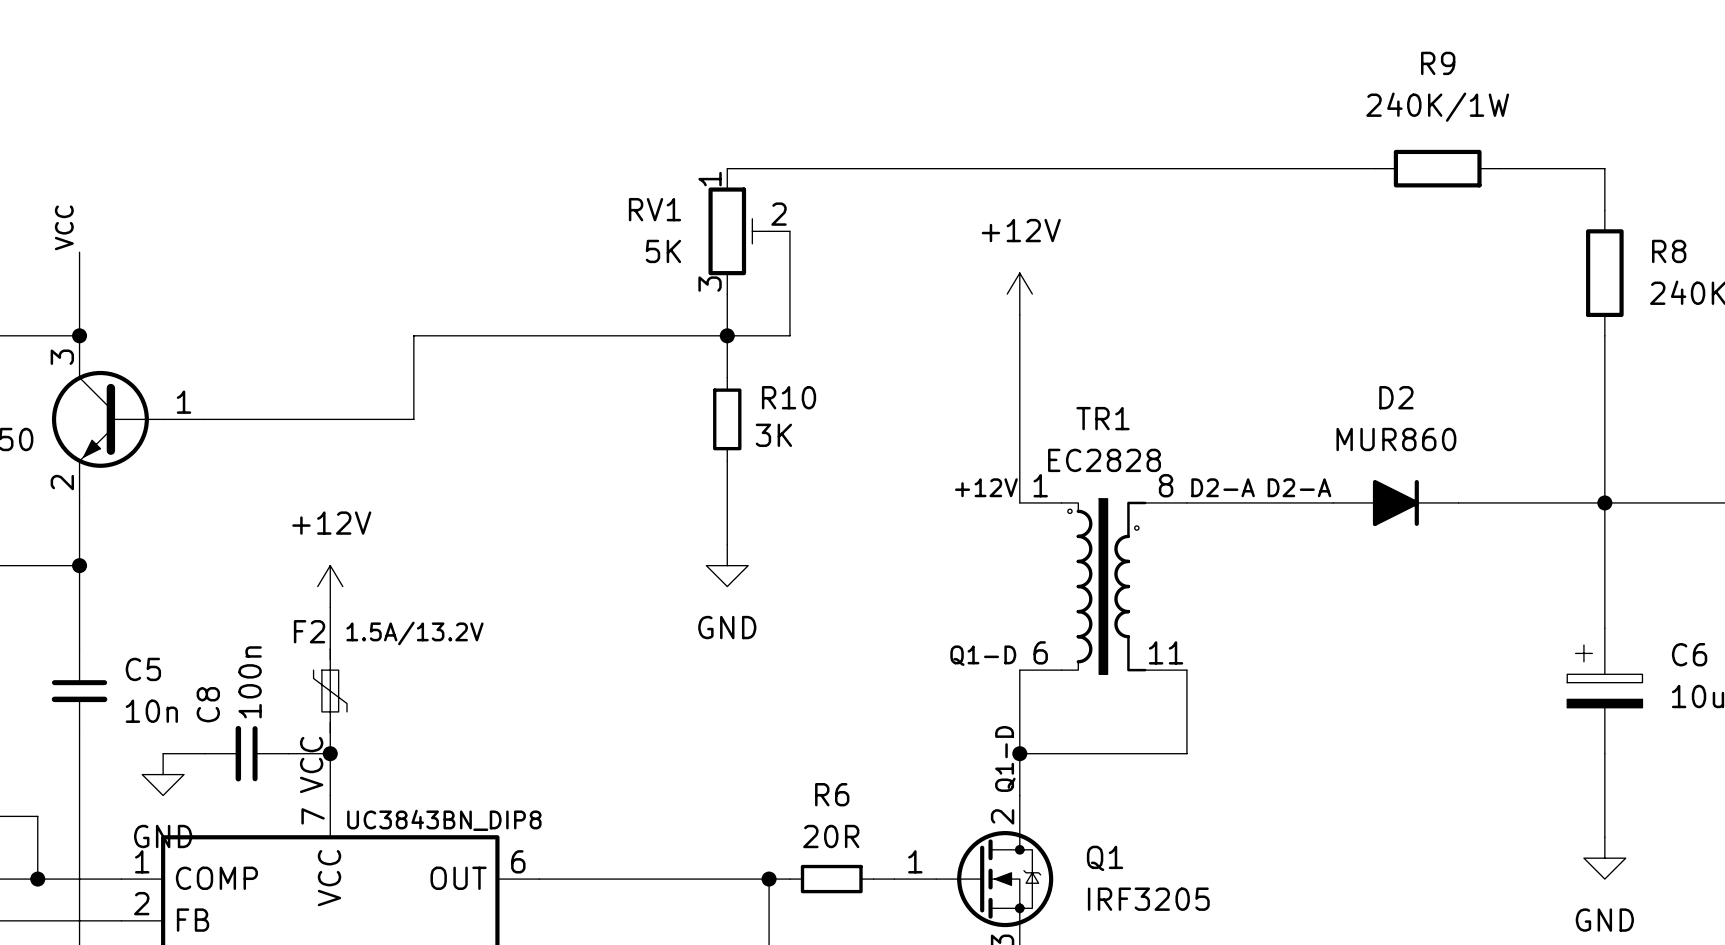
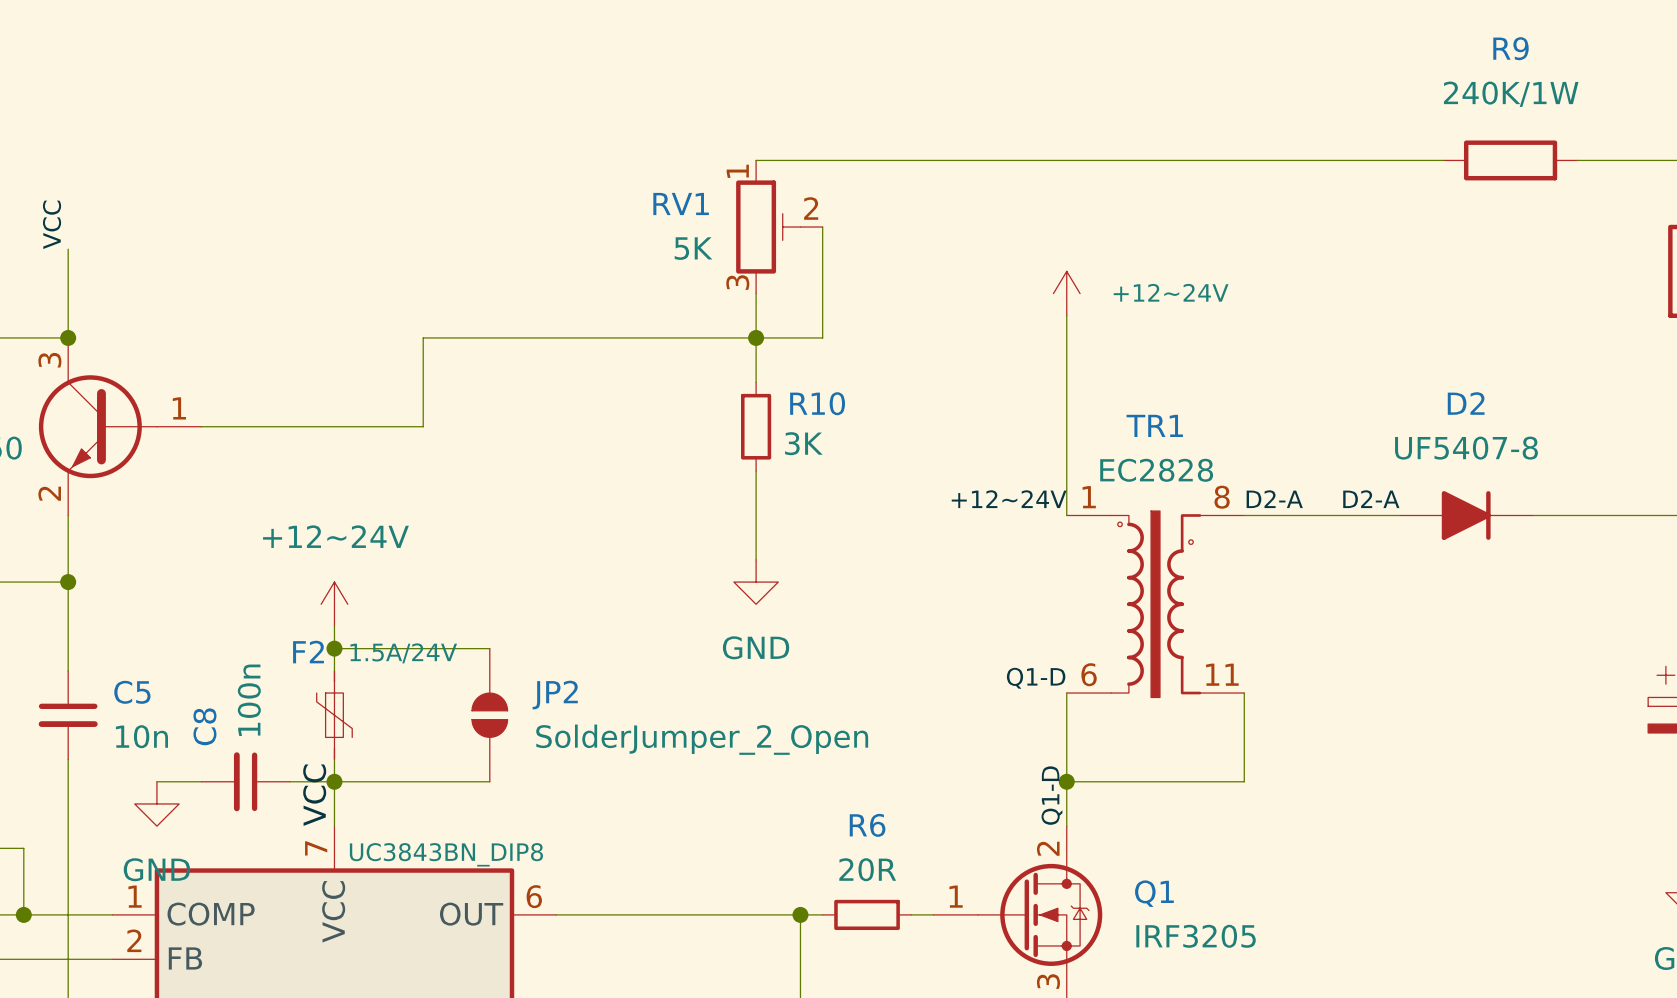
power symbol: +12V (1019, 294) -> +12~24V (1066, 293)
D2 value: MUR860 (1396, 439) -> UF5407-8 (1466, 448)
label: +12V (986, 487) -> +12~24V (1009, 499)
power symbol: +12V (330, 586) -> +12~24V (334, 604)
wire: none -> (334, 648) (489, 648)
junction: none -> (334, 648)
F2 value: 1.5A/13.2V (414, 633) -> 1.5A/24V (403, 653)
JP2: none -> SolderJumper_2_Open (489, 715)
wire: none -> (334, 781) (489, 781)

